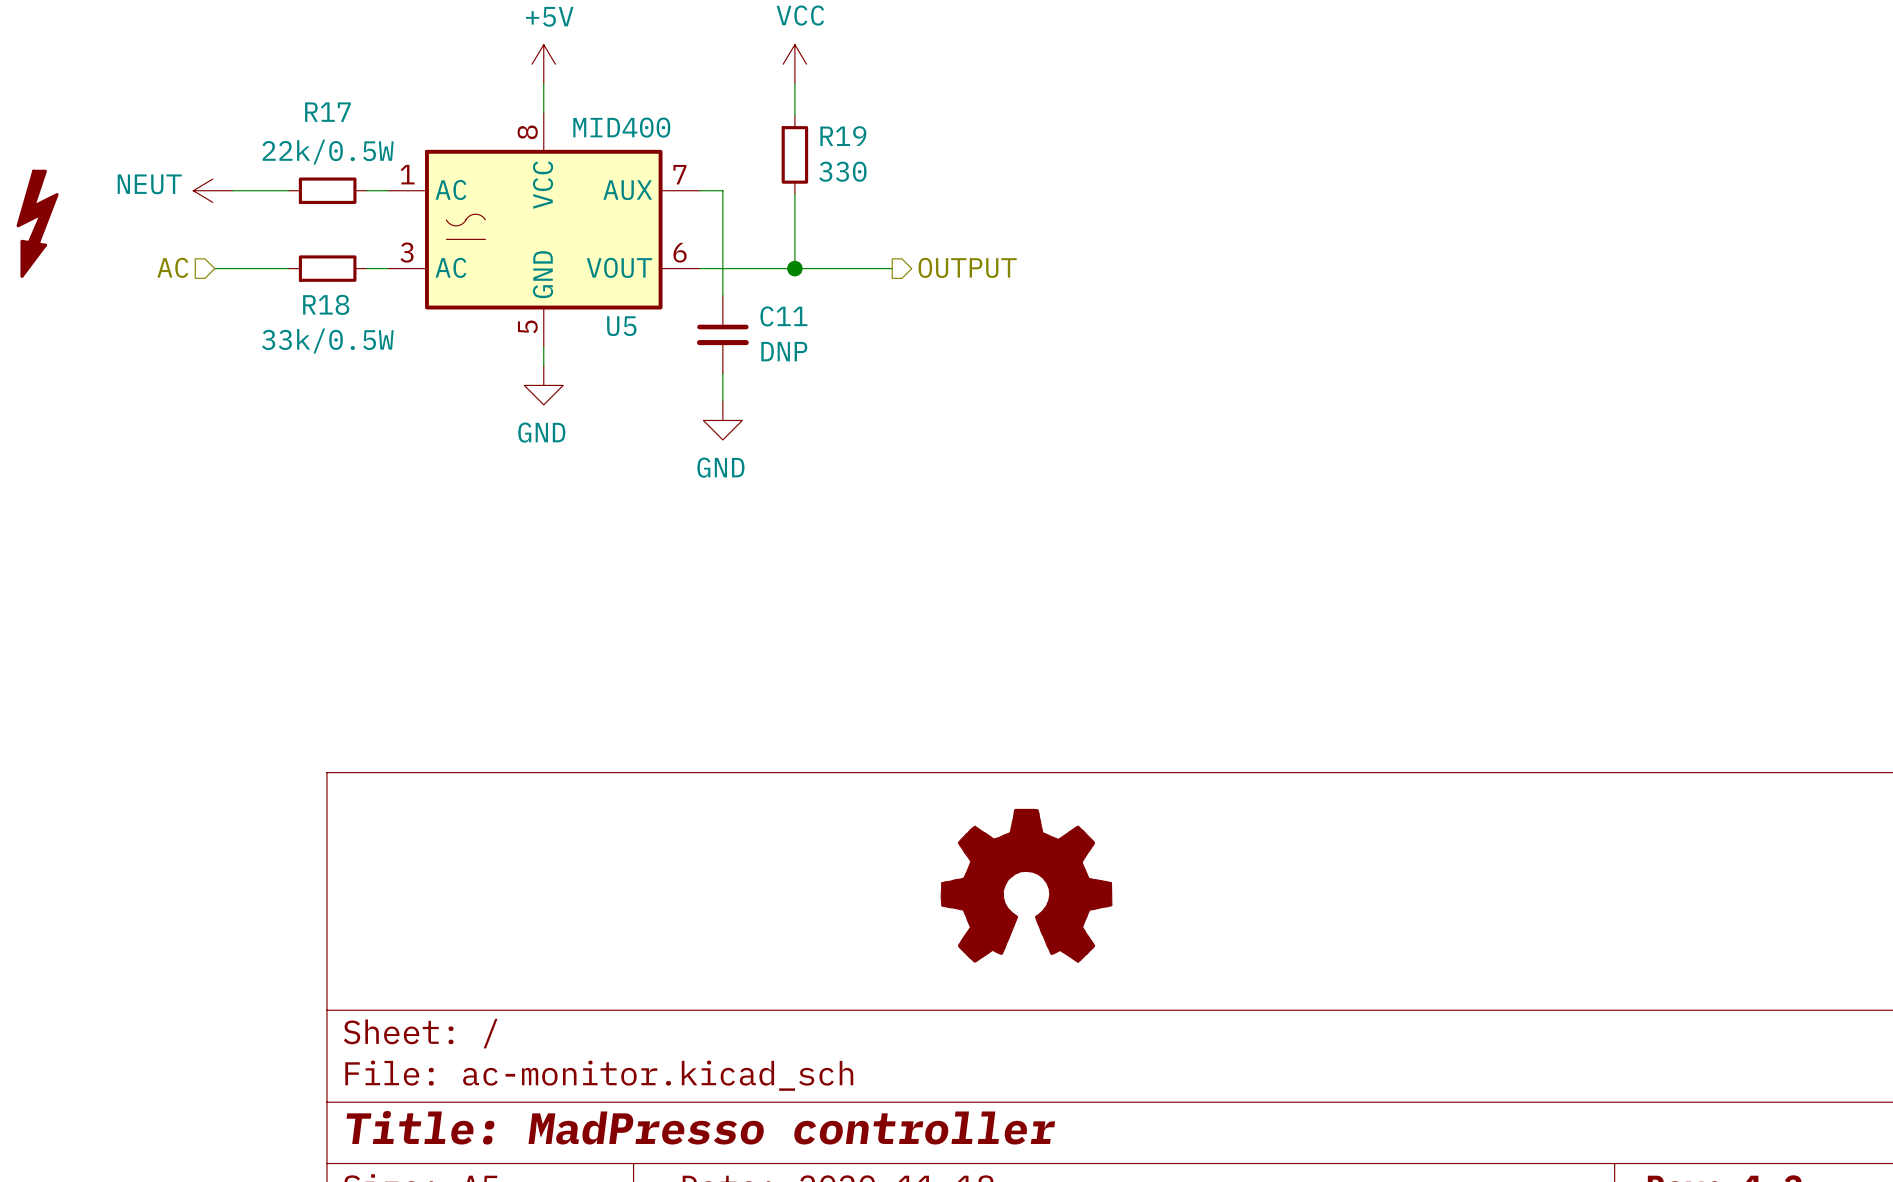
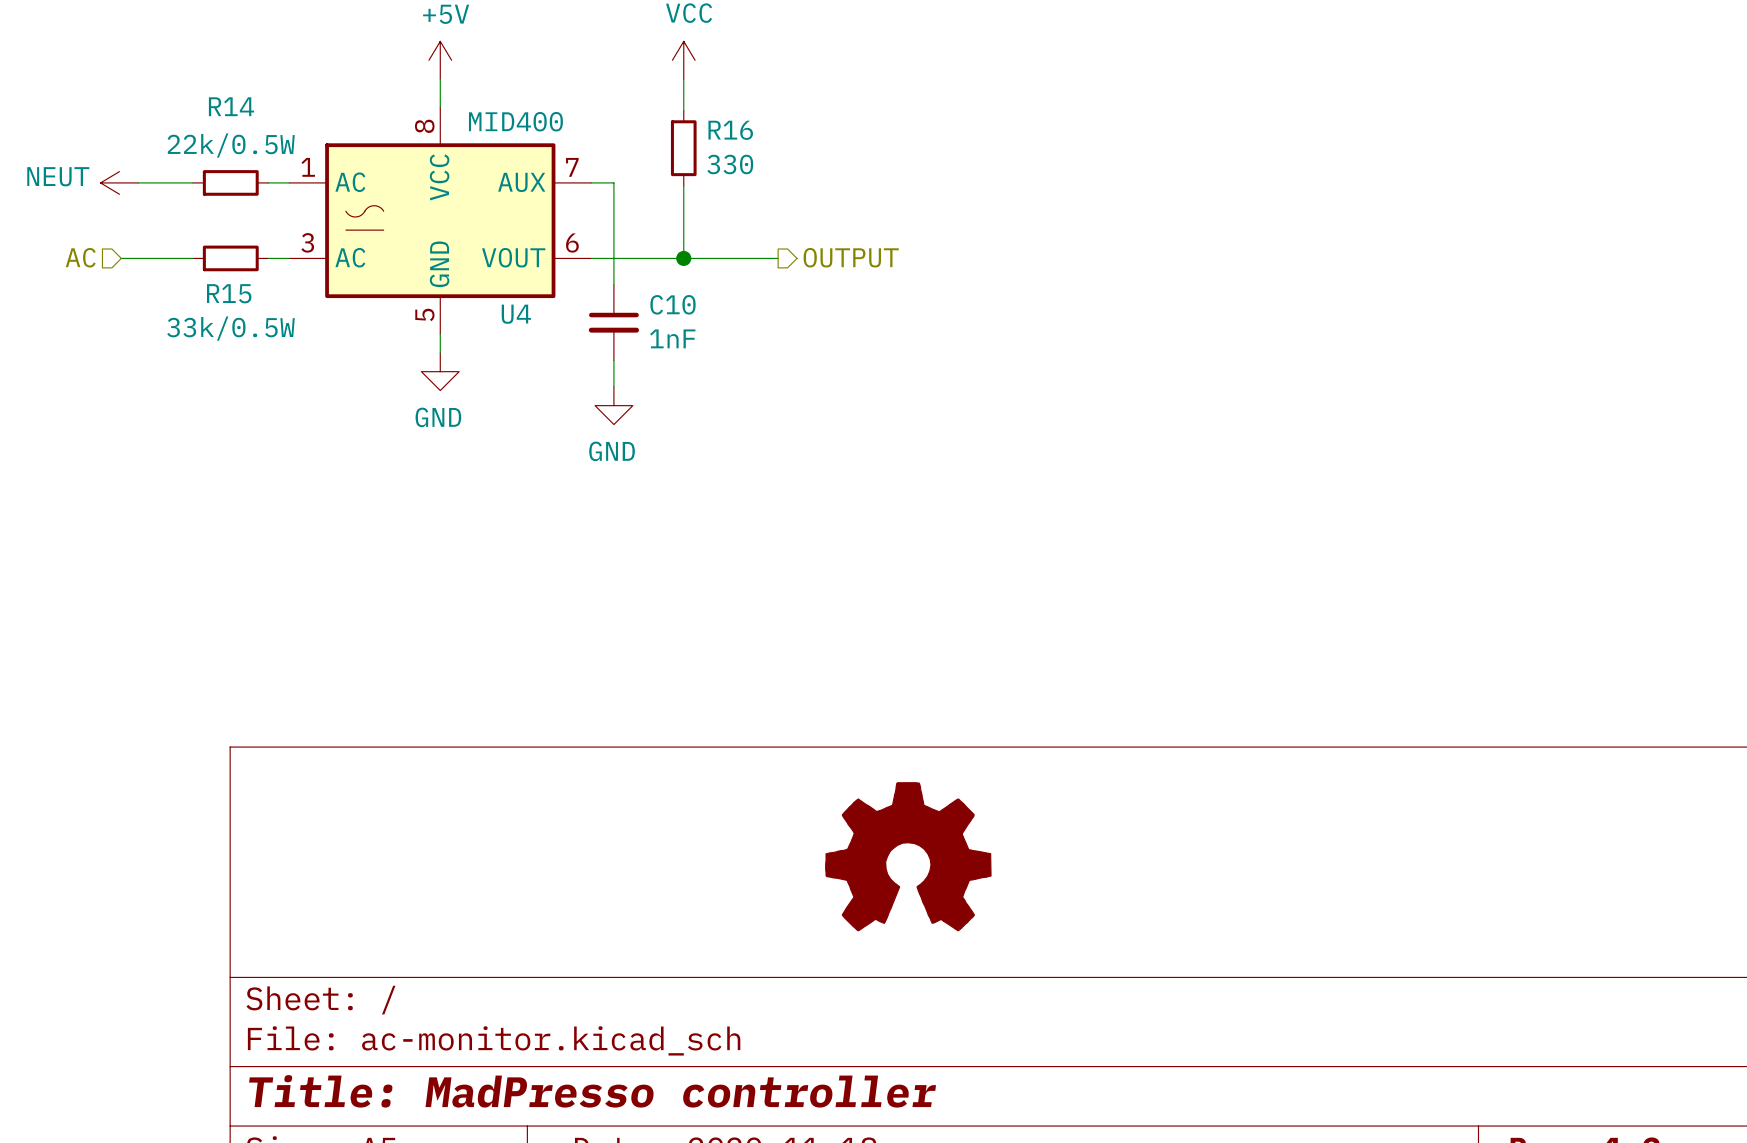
R17 name: R17 (327, 112) -> R14 (231, 106)
R19 name: R19 (843, 136) -> R16 (730, 130)
R18 name: R18 (326, 304) -> R15 (229, 293)
C11 name: C11 (783, 316) -> C10 (672, 304)
U5 name: U5 (621, 326) -> U4 (516, 314)
C11 value: DNP (784, 351) -> 1nF (672, 338)

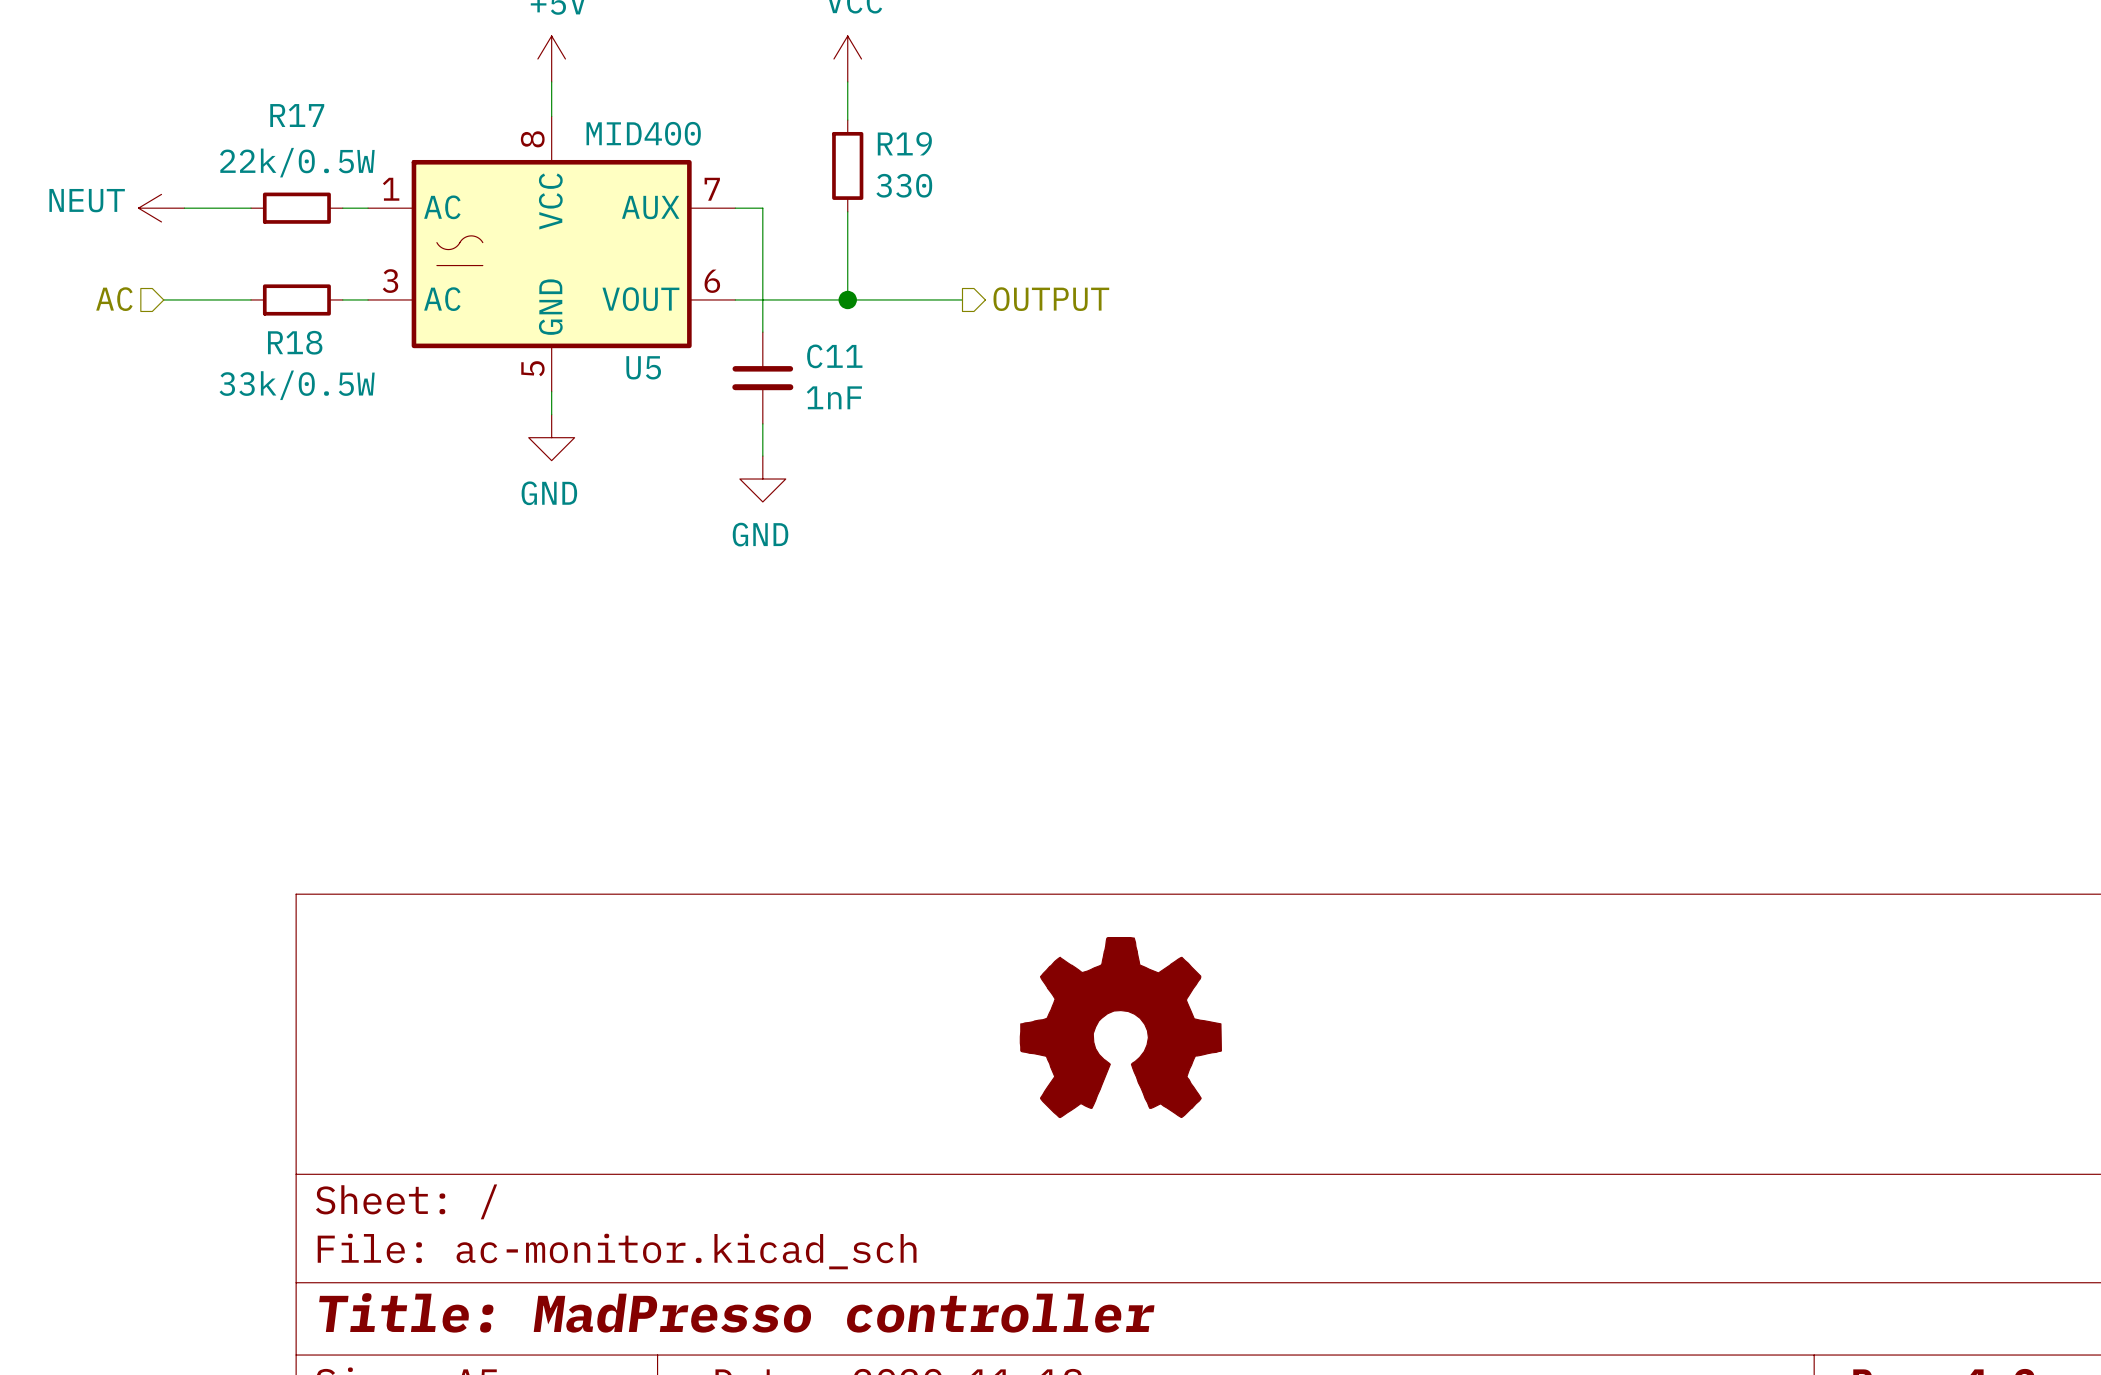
R14 name: R14 (231, 106) -> R17 (297, 115)
R16 name: R16 (730, 130) -> R19 (904, 143)
R15 name: R15 (229, 293) -> R18 (295, 342)
C10 name: C10 (672, 304) -> C11 (834, 356)
U4 name: U4 (516, 314) -> U5 (643, 367)

